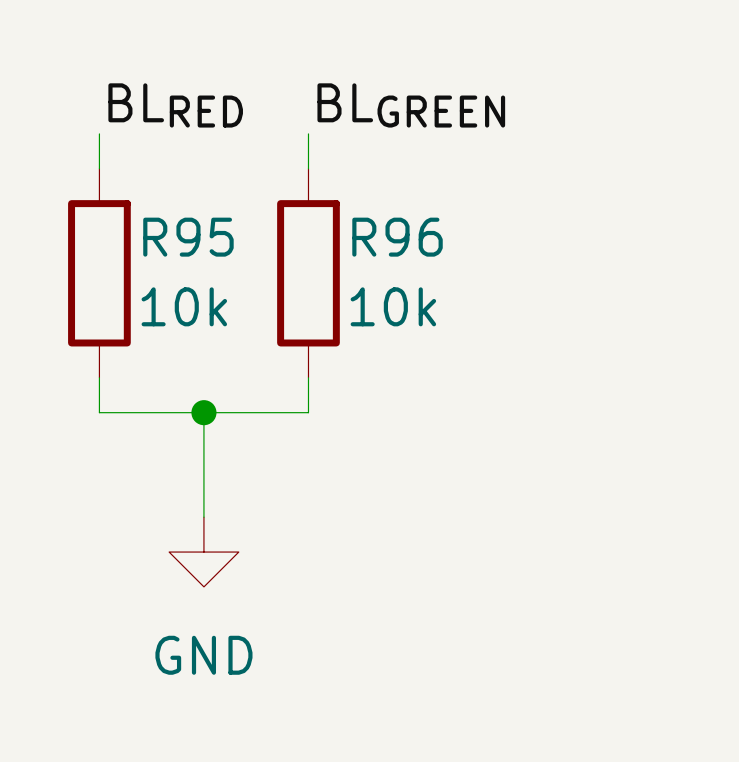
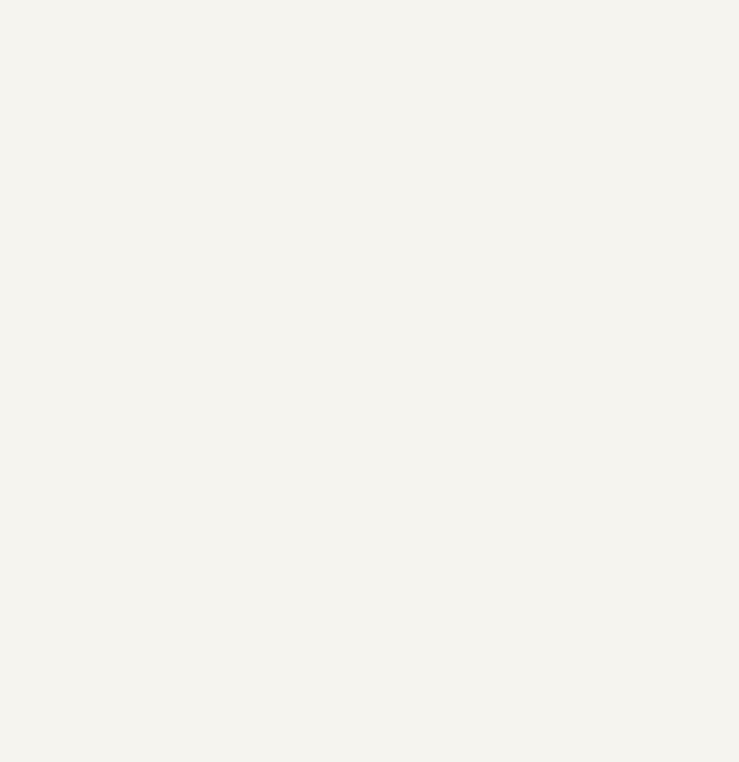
label: BLRED (175, 105) -> none
label: BLGREEN (411, 105) -> none
wire: (99, 133) (99, 168) -> none
wire: (308, 133) (308, 168) -> none
R95: 10k (99, 273) -> none
R96: 10k (308, 273) -> none
wire: (99, 377) (99, 412) (308, 412) (308, 377) -> none
wire: (203, 412) (203, 517) -> none
junction: (203, 412) -> none
power symbol: GND (203, 552) -> none

